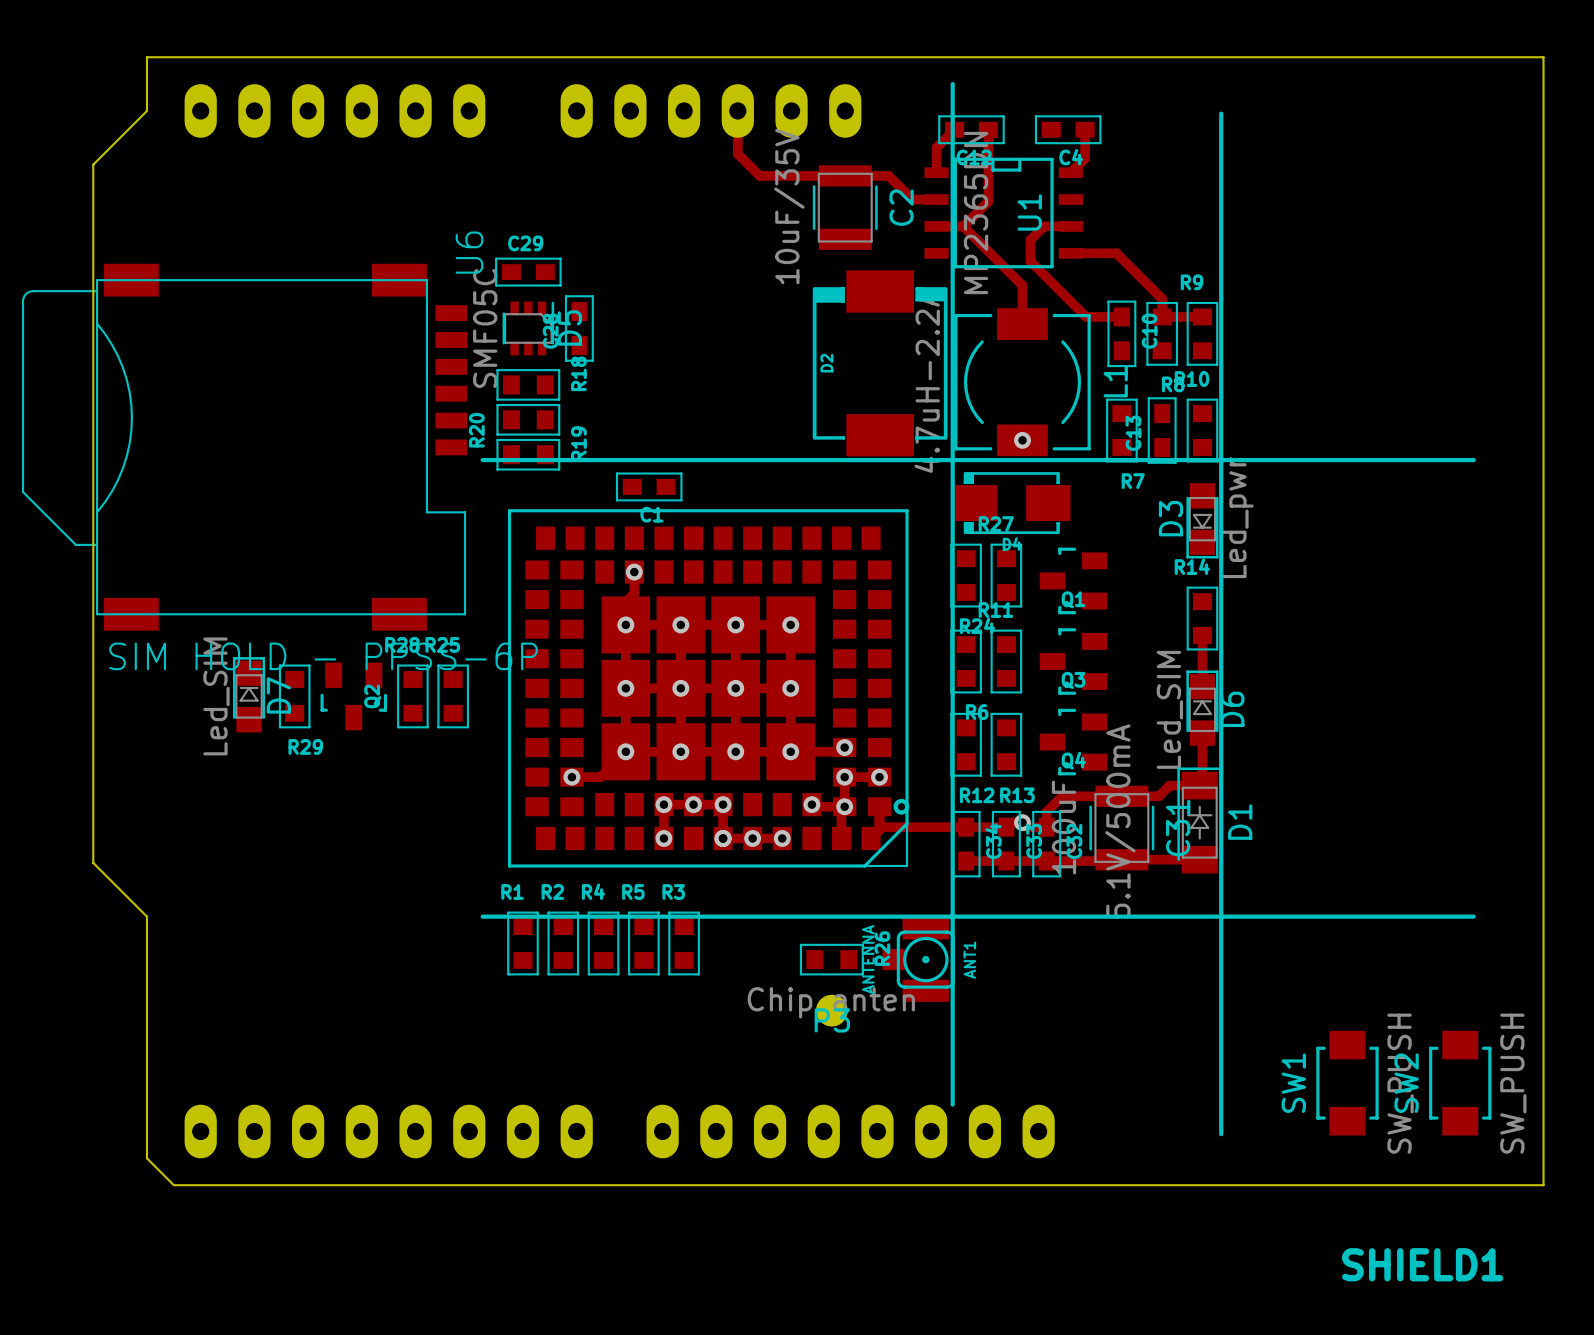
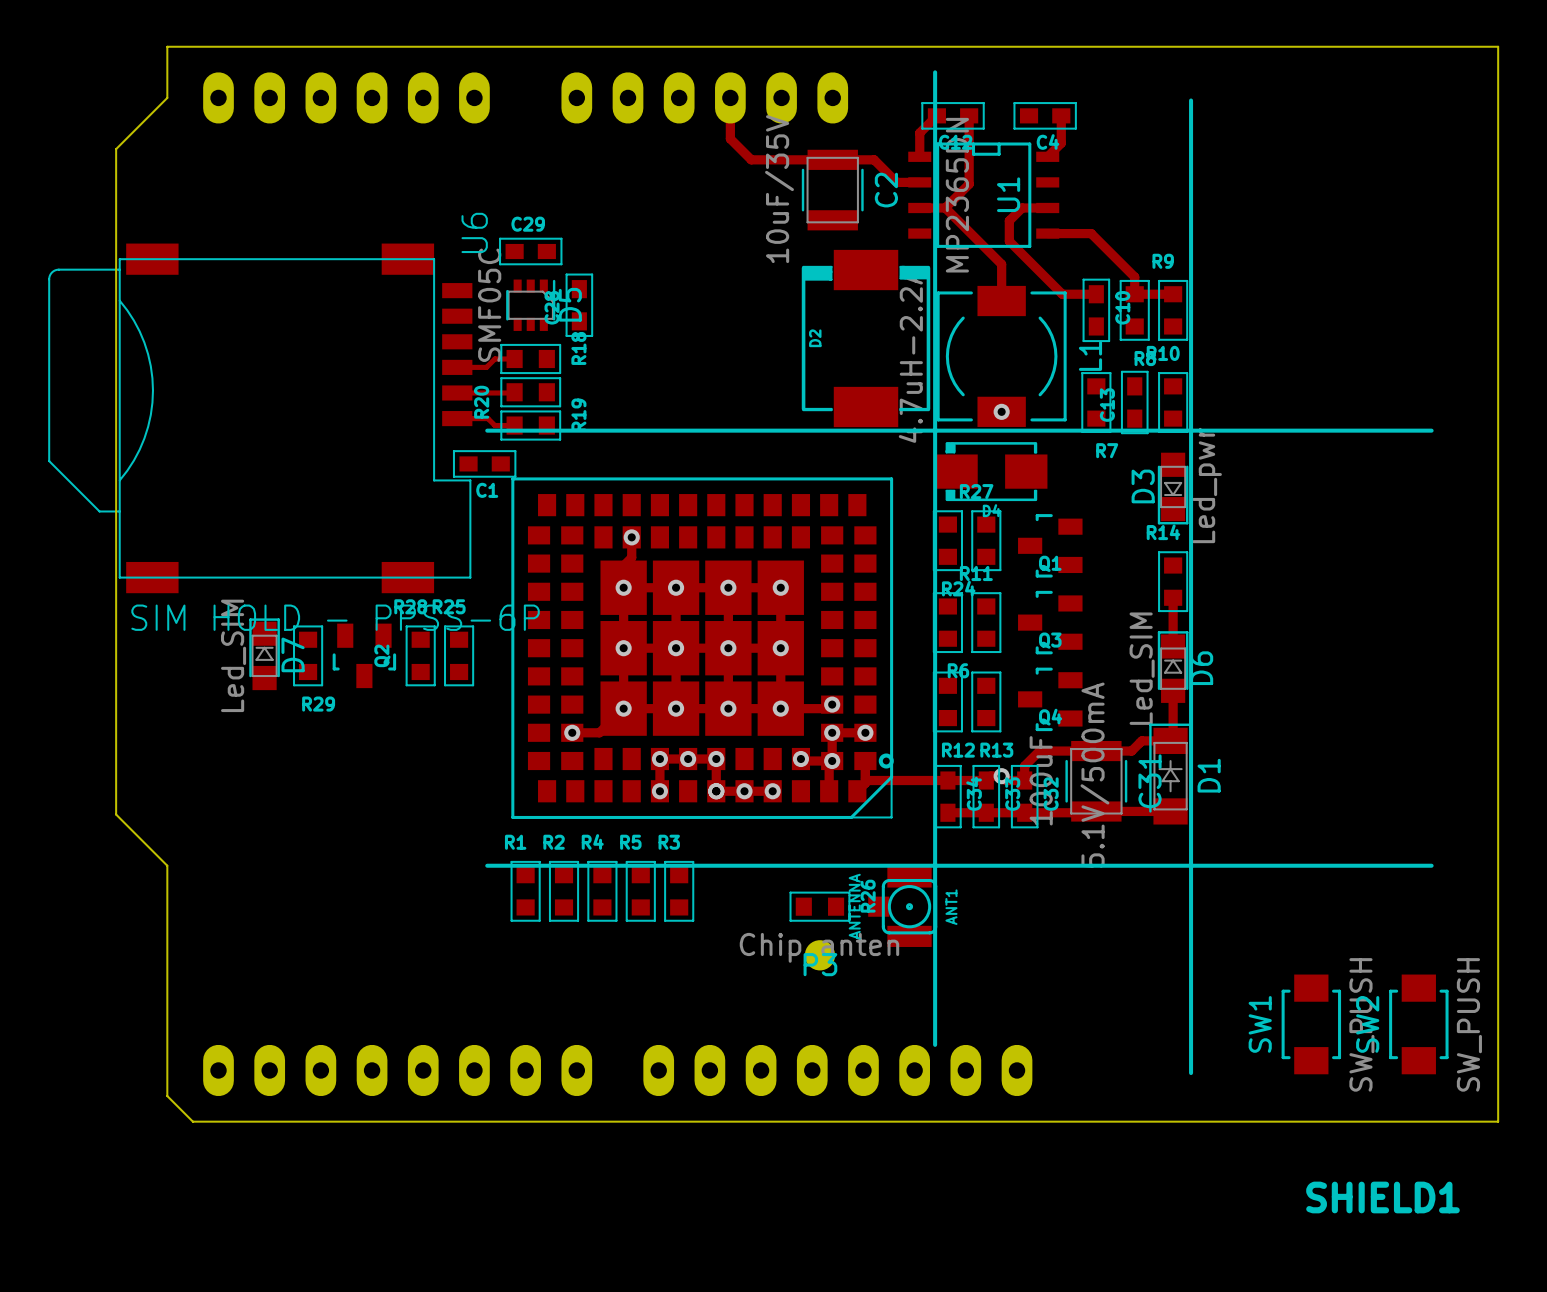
track: none -> (514, 358) (494, 358) (486, 367) (457, 367)
track: none -> (514, 392) (457, 392)
track: none -> (457, 418) (487, 418) (494, 425) (514, 425)
C1 position: (649, 486) -> (484, 463)

